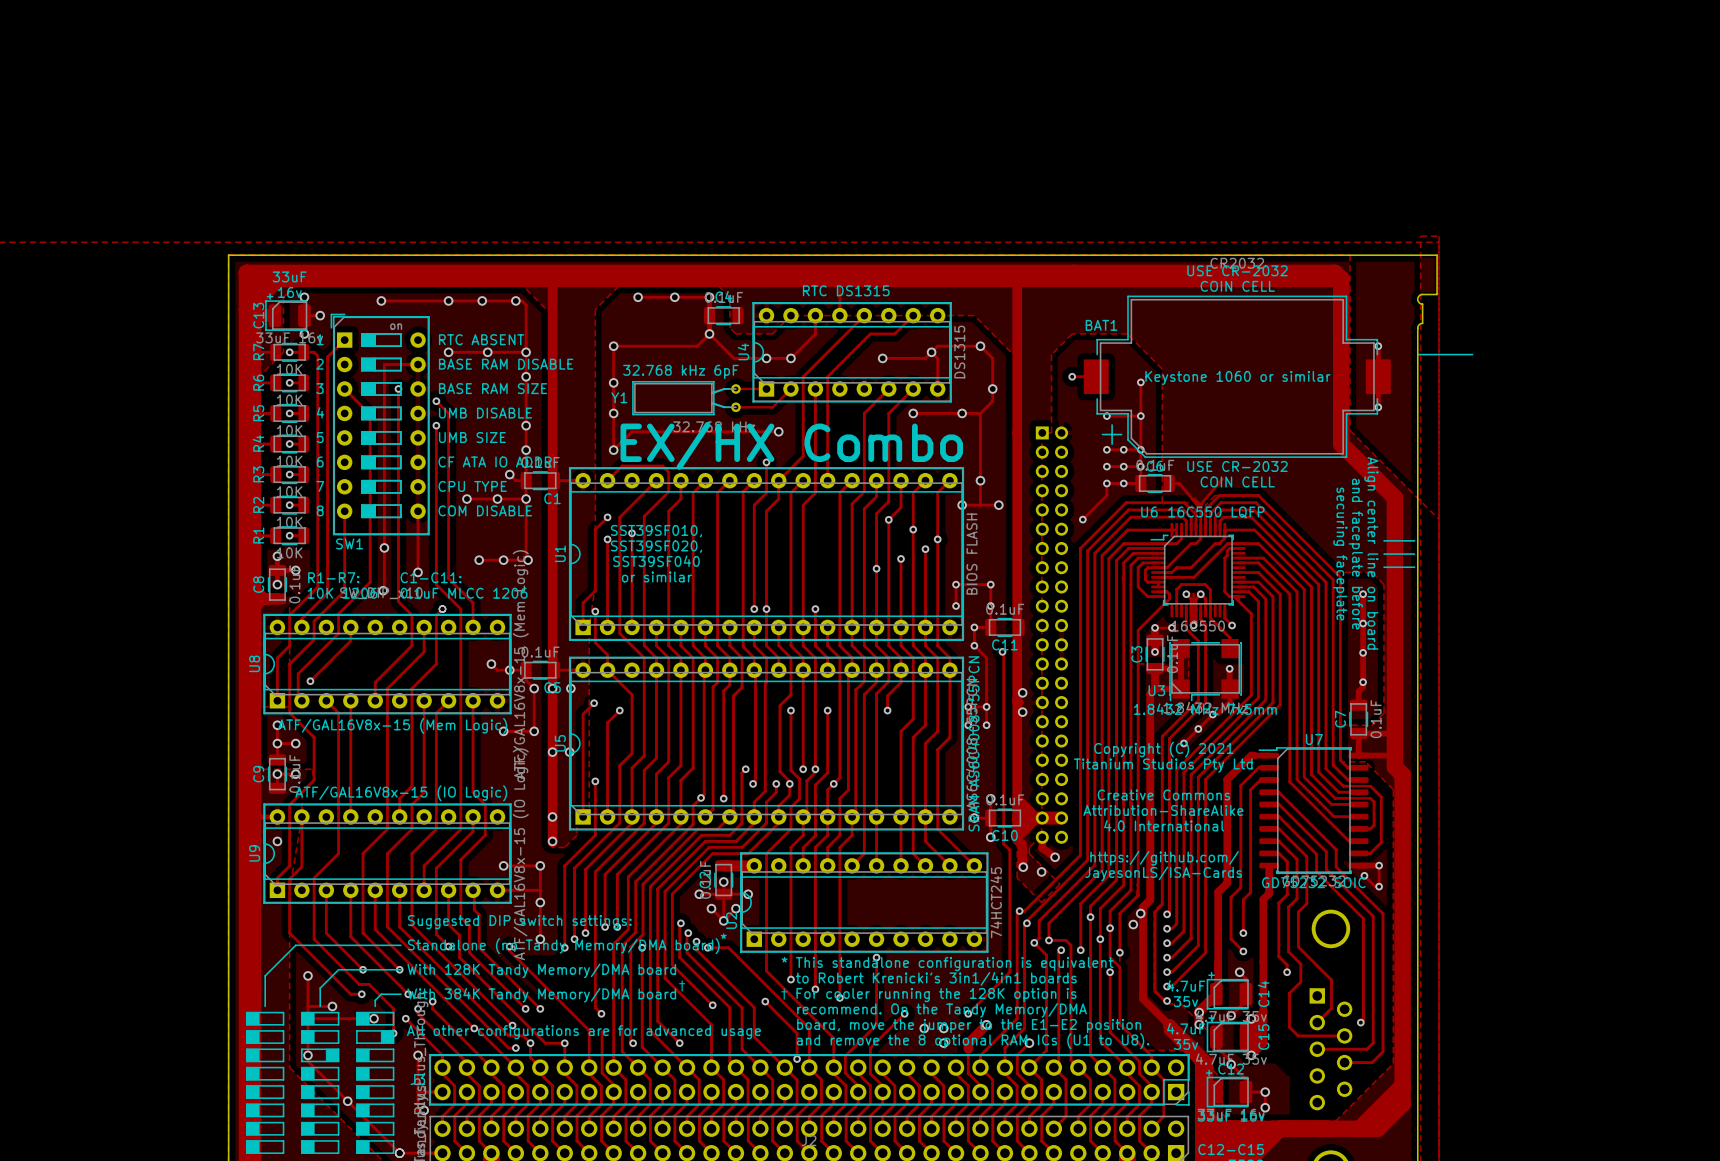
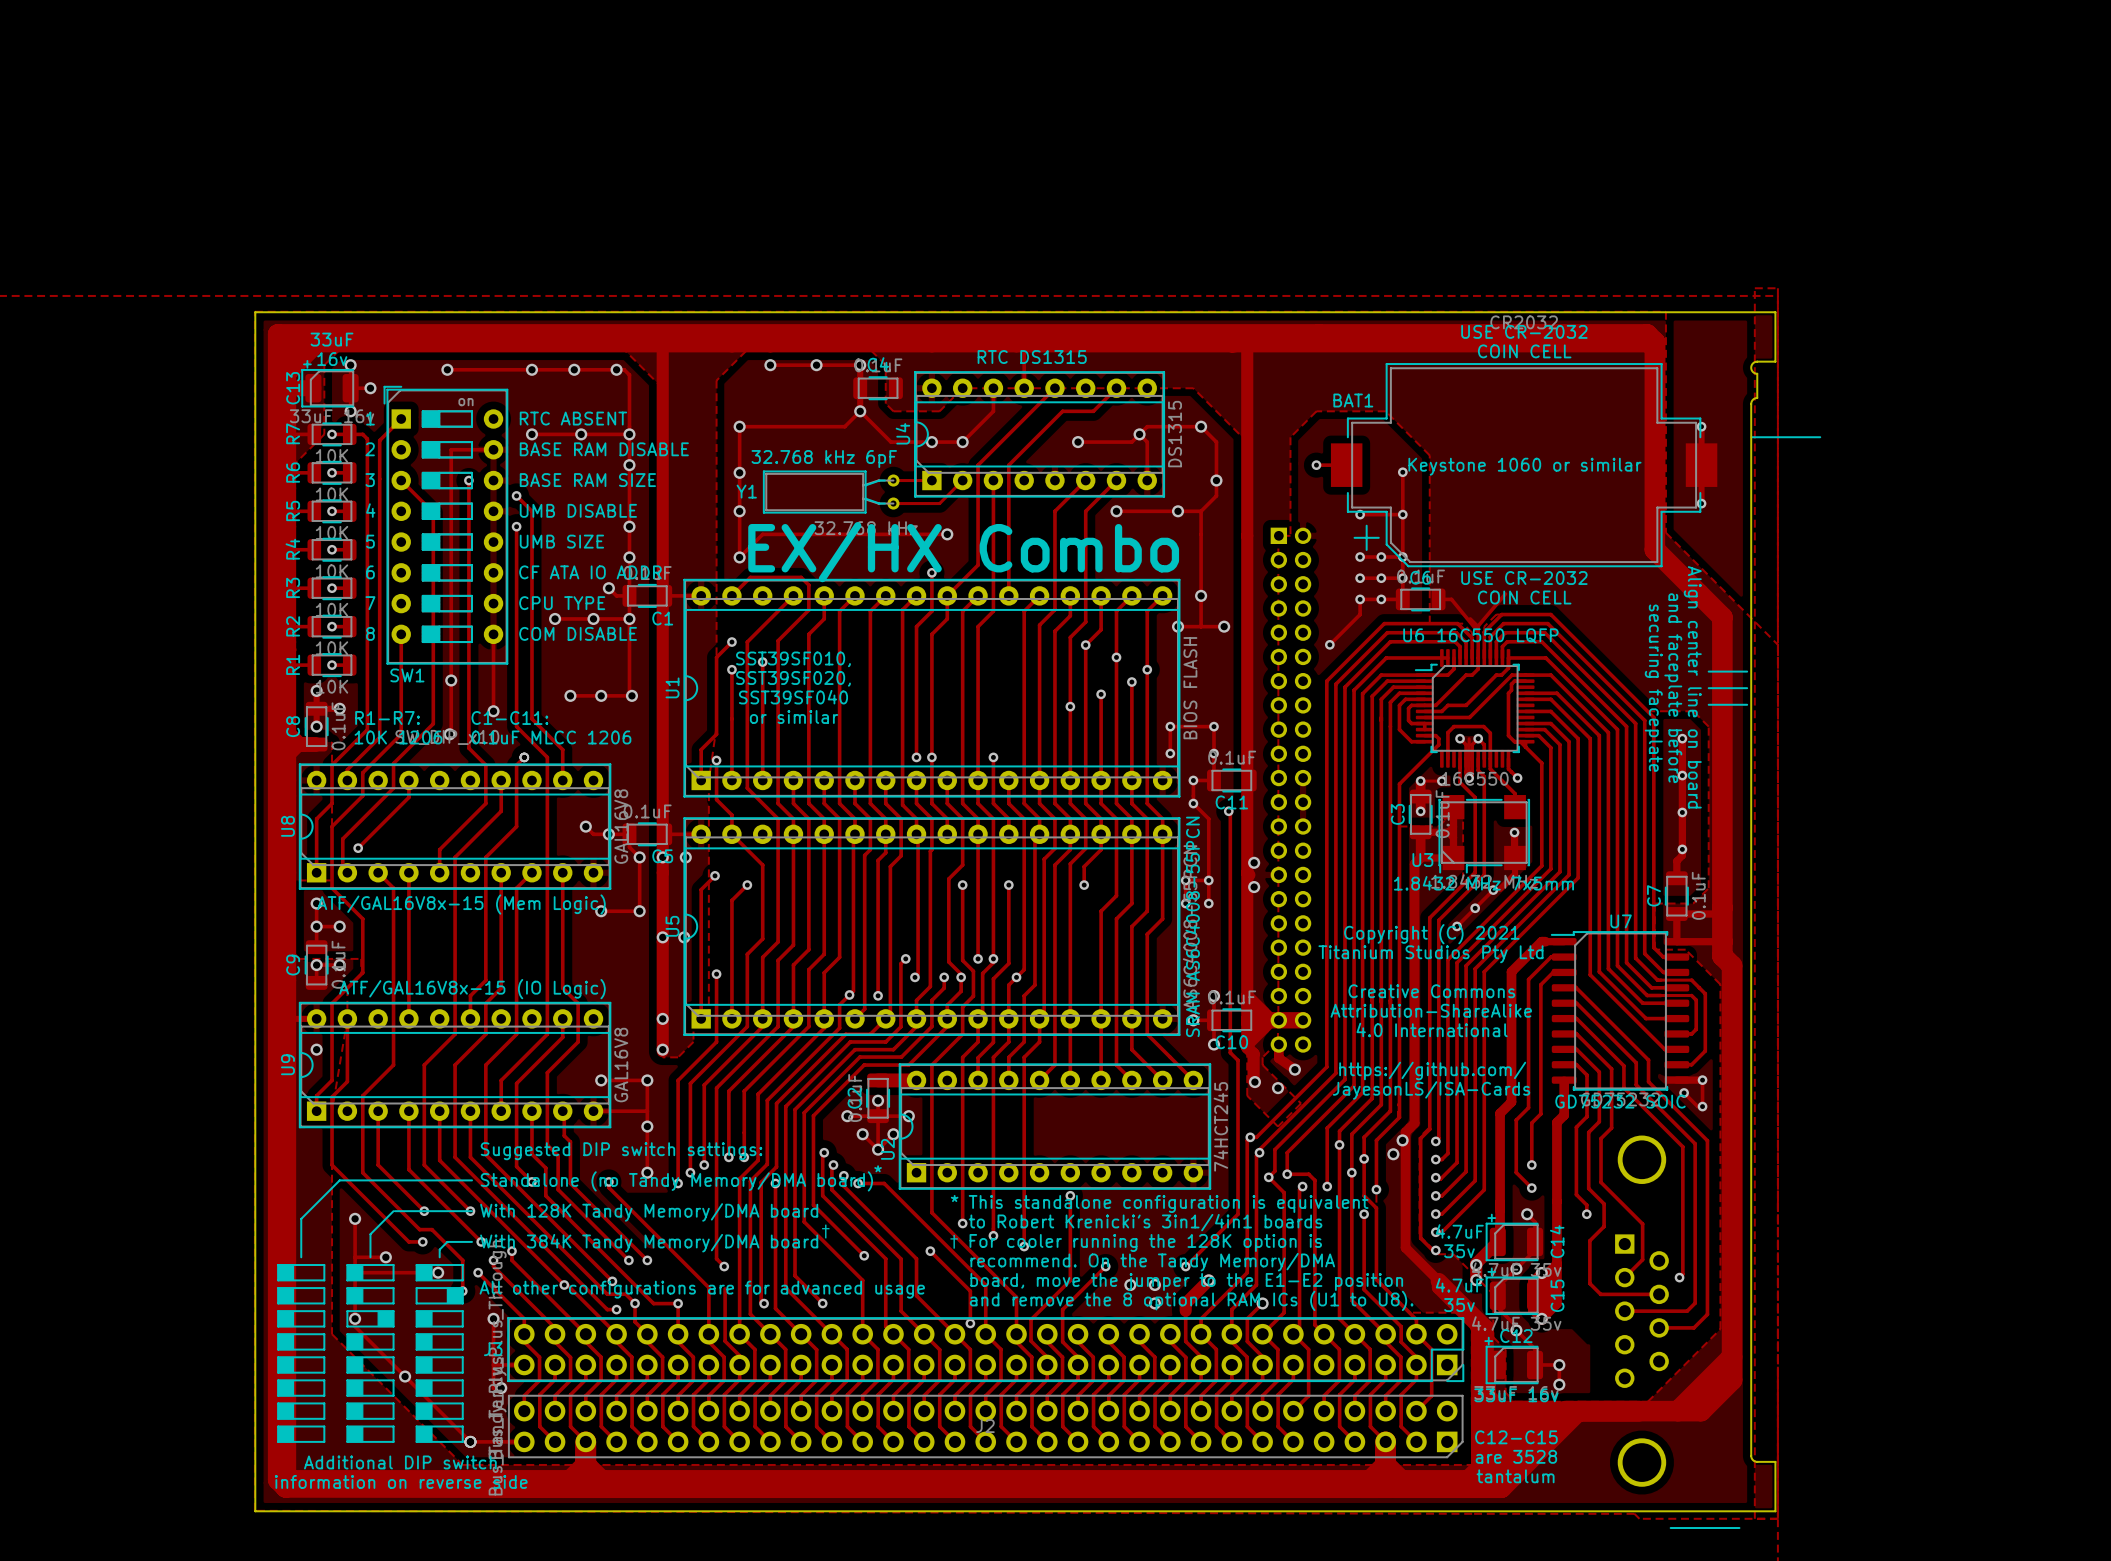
U8 value: ATF/GAL16V8x-15 (Mem Logic) (520, 664) -> GAL16V8 (621, 826)
U9 value: ATF/GAL16V8x-15 (IO Logic) (520, 854) -> GAL16V8 (621, 1065)

